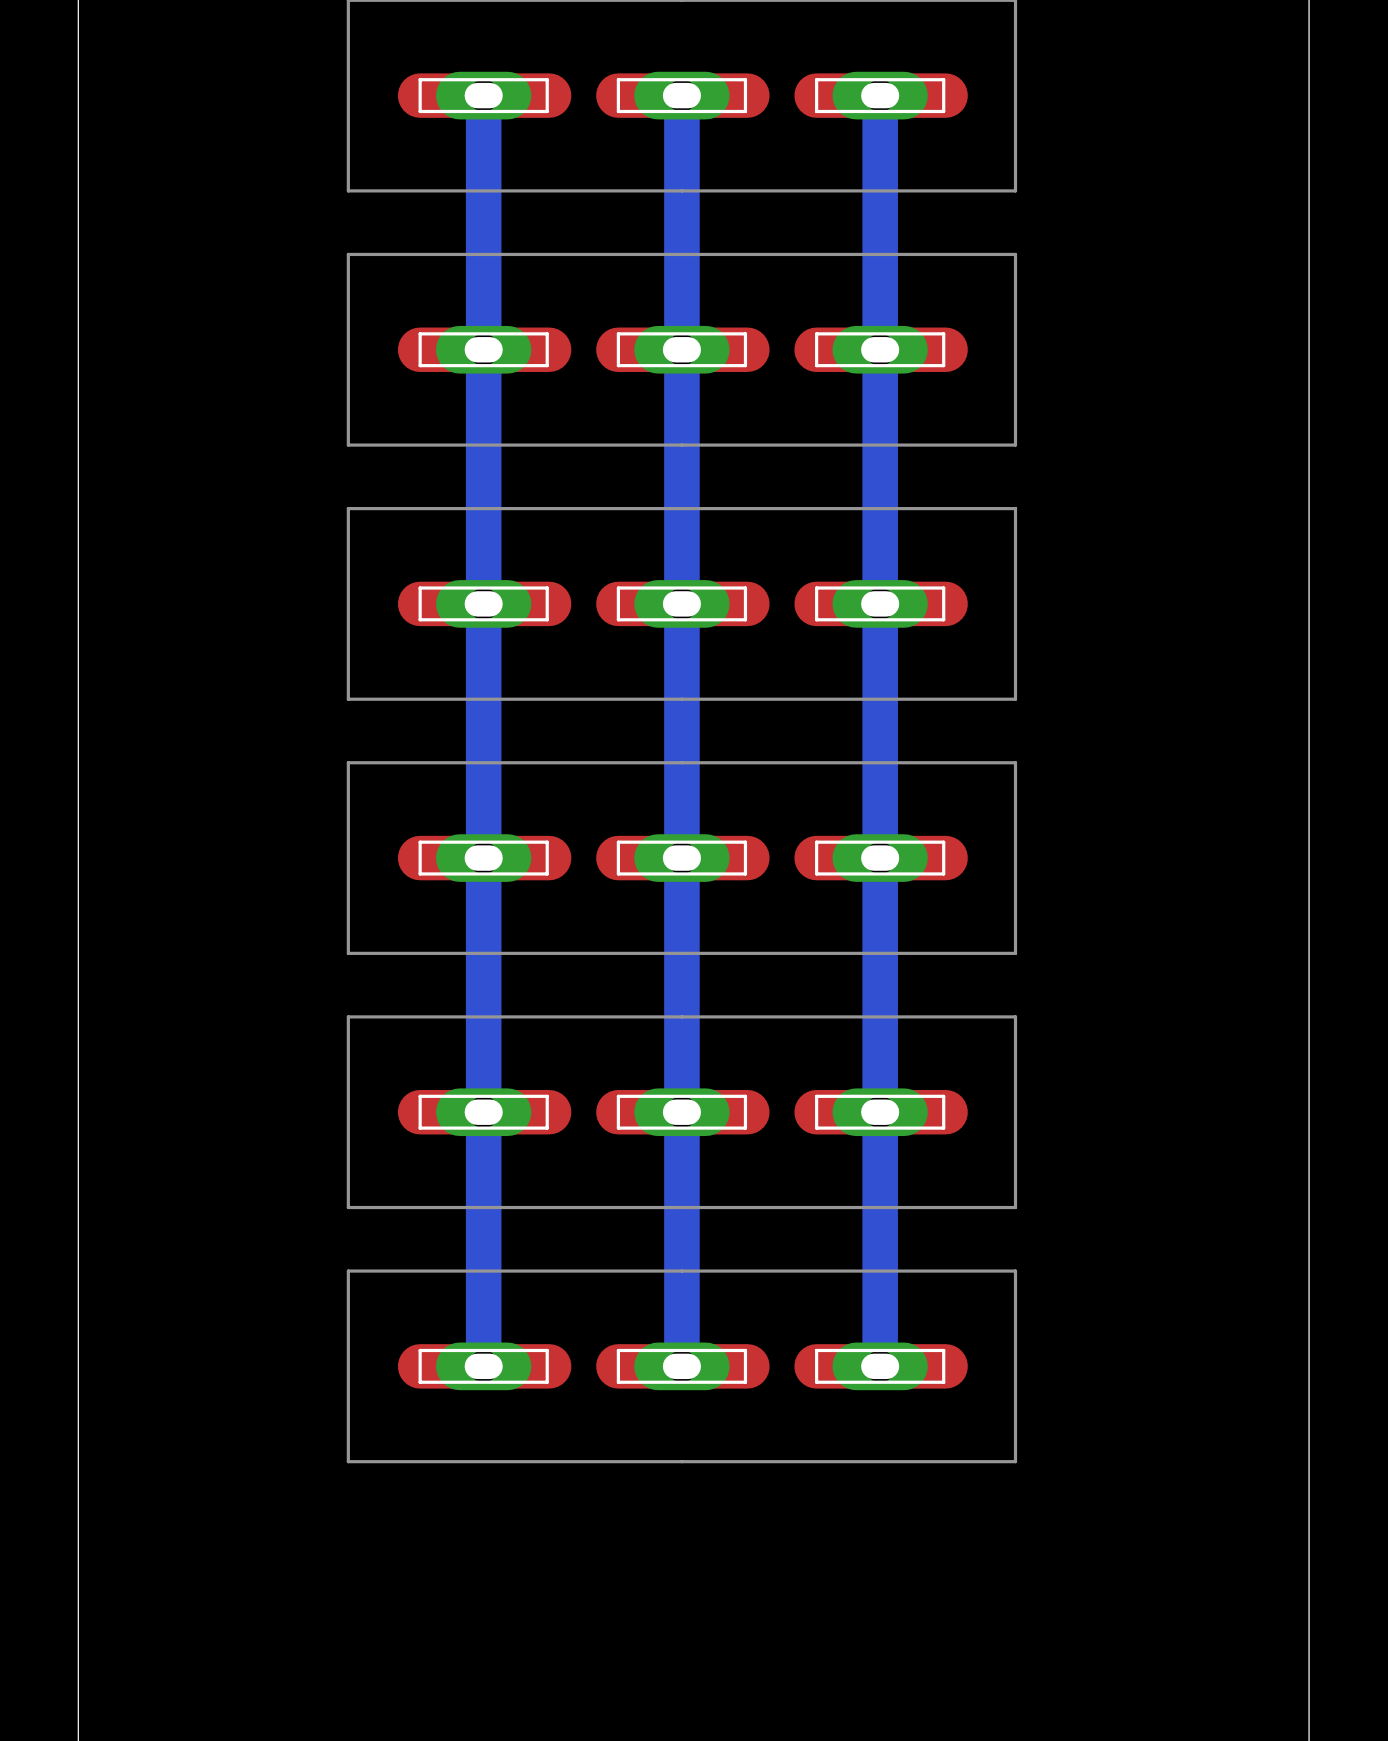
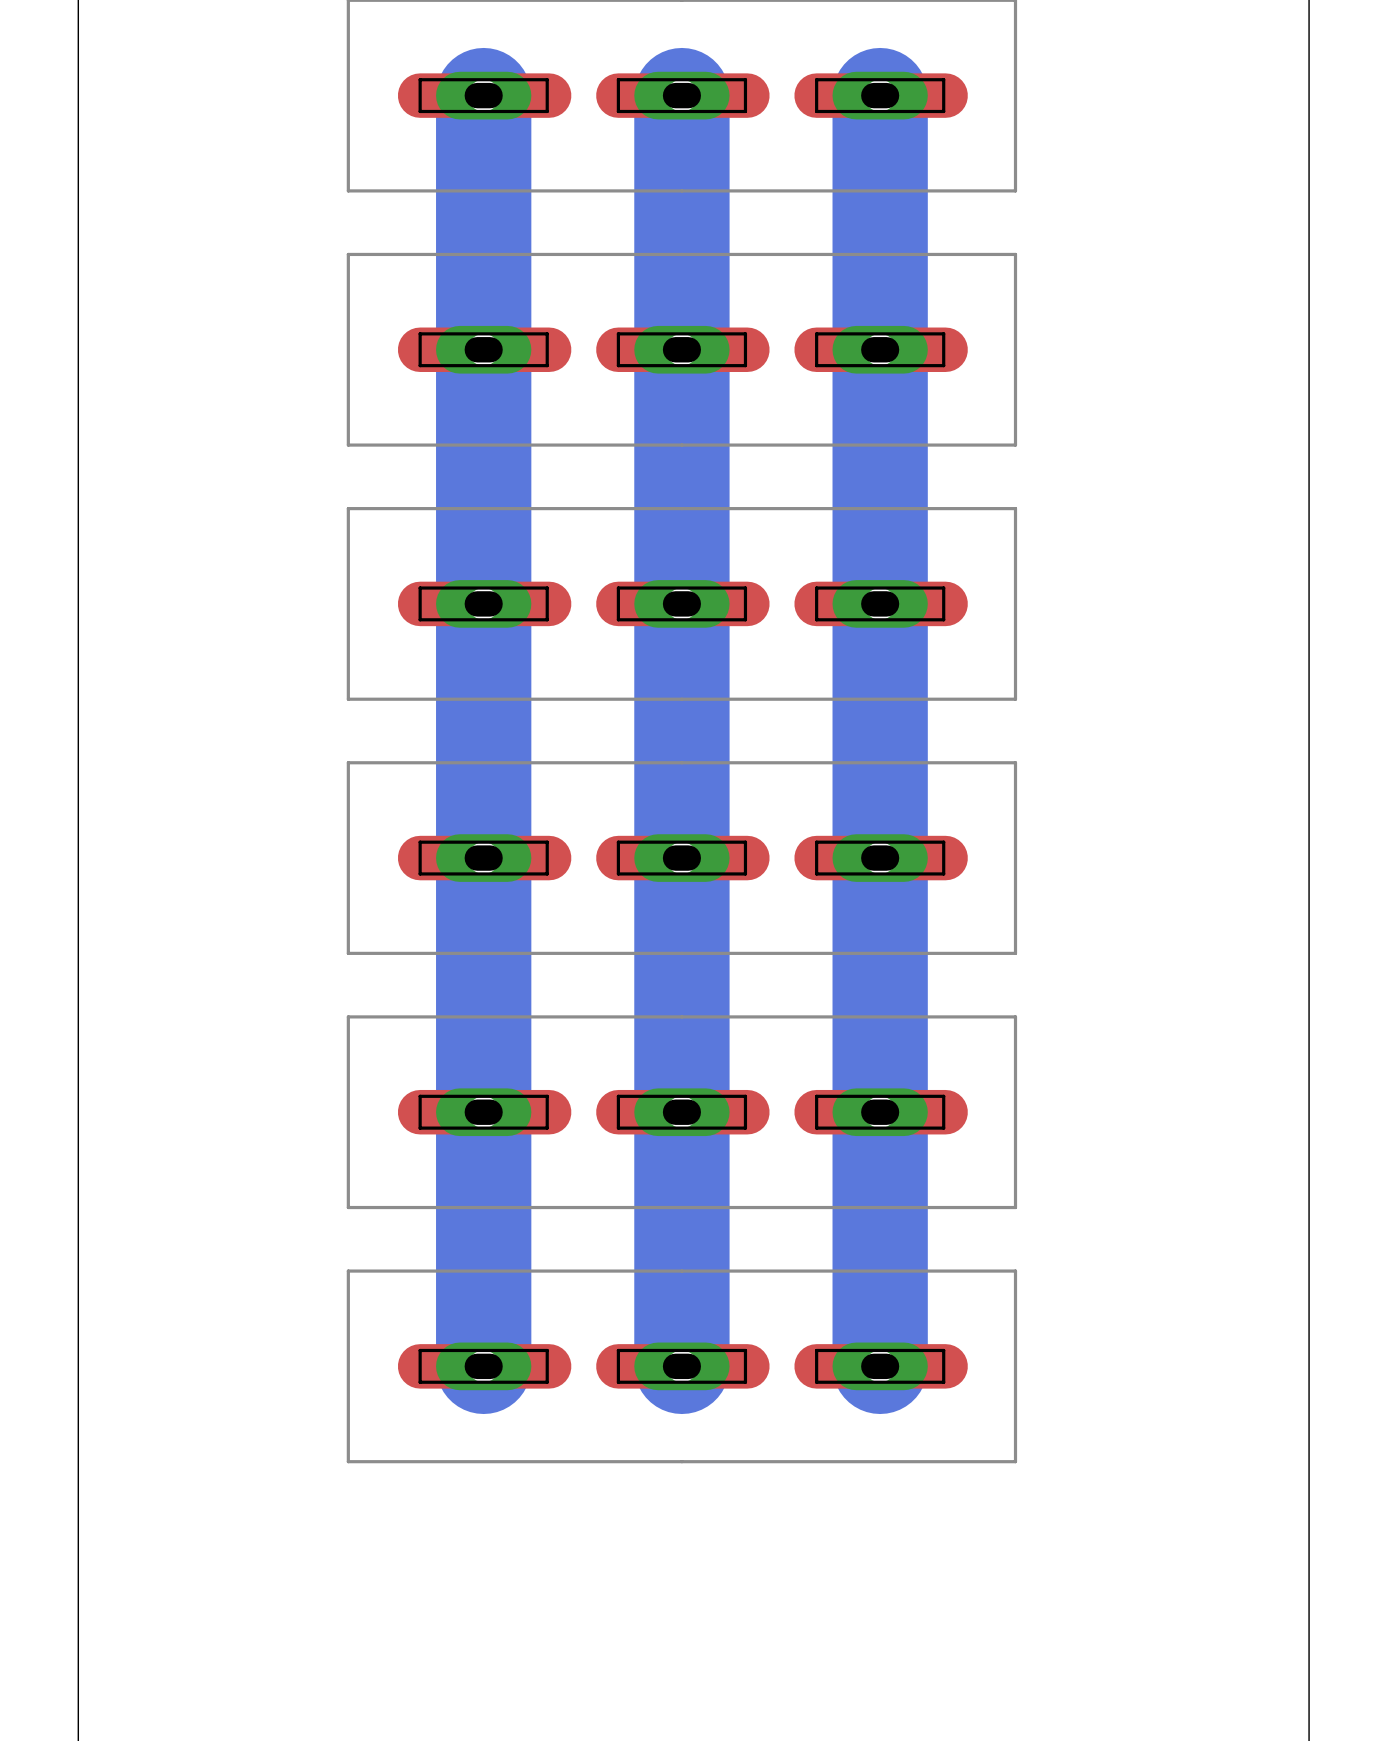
bottom track width: thin (483, 95) (483, 1366) -> thick (483, 95) (483, 1366)
bottom track width: thin (681, 95) (681, 1366) -> thick (681, 95) (681, 1366)
bottom track width: thin (880, 95) (880, 1366) -> thick (880, 95) (880, 1366)

